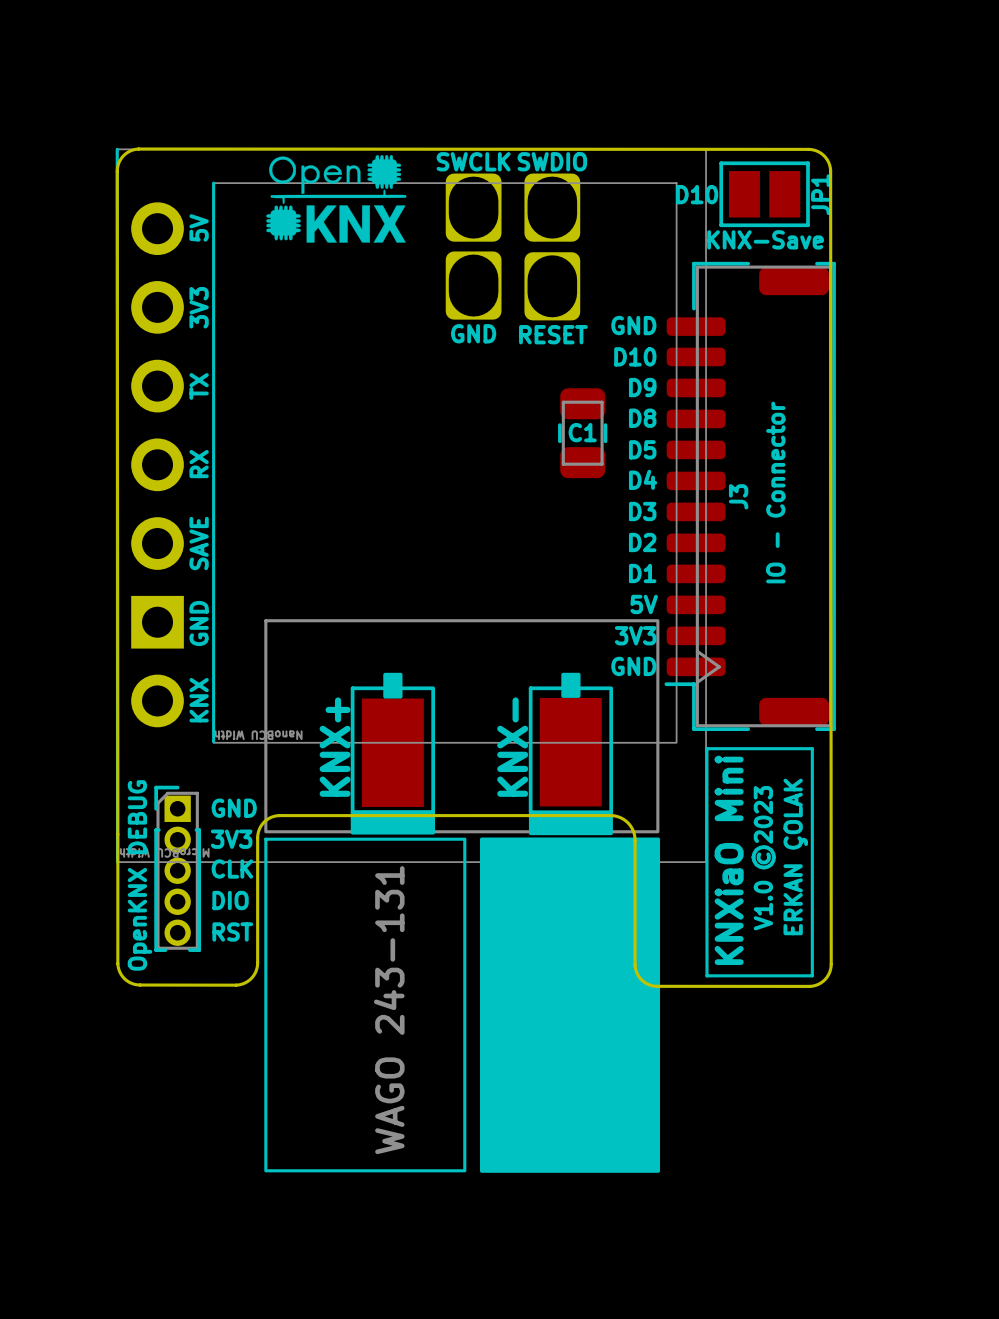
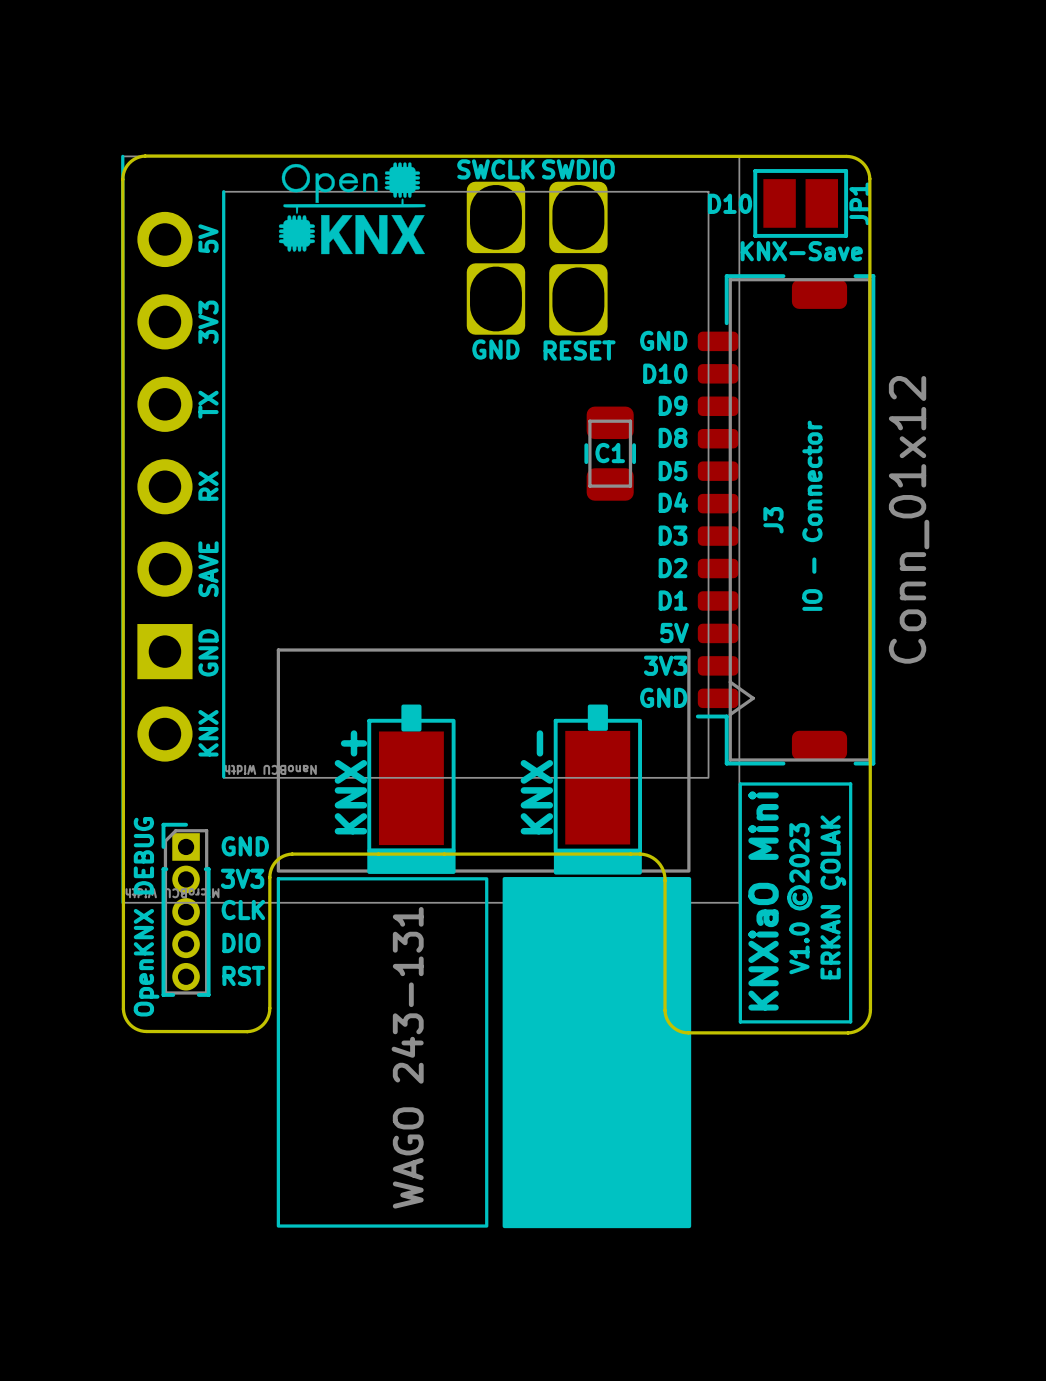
J3 footprint: [664, 261, 836, 732] -> [695, 274, 876, 766]
J3 value: none -> Conn_01x12 (909, 519)

